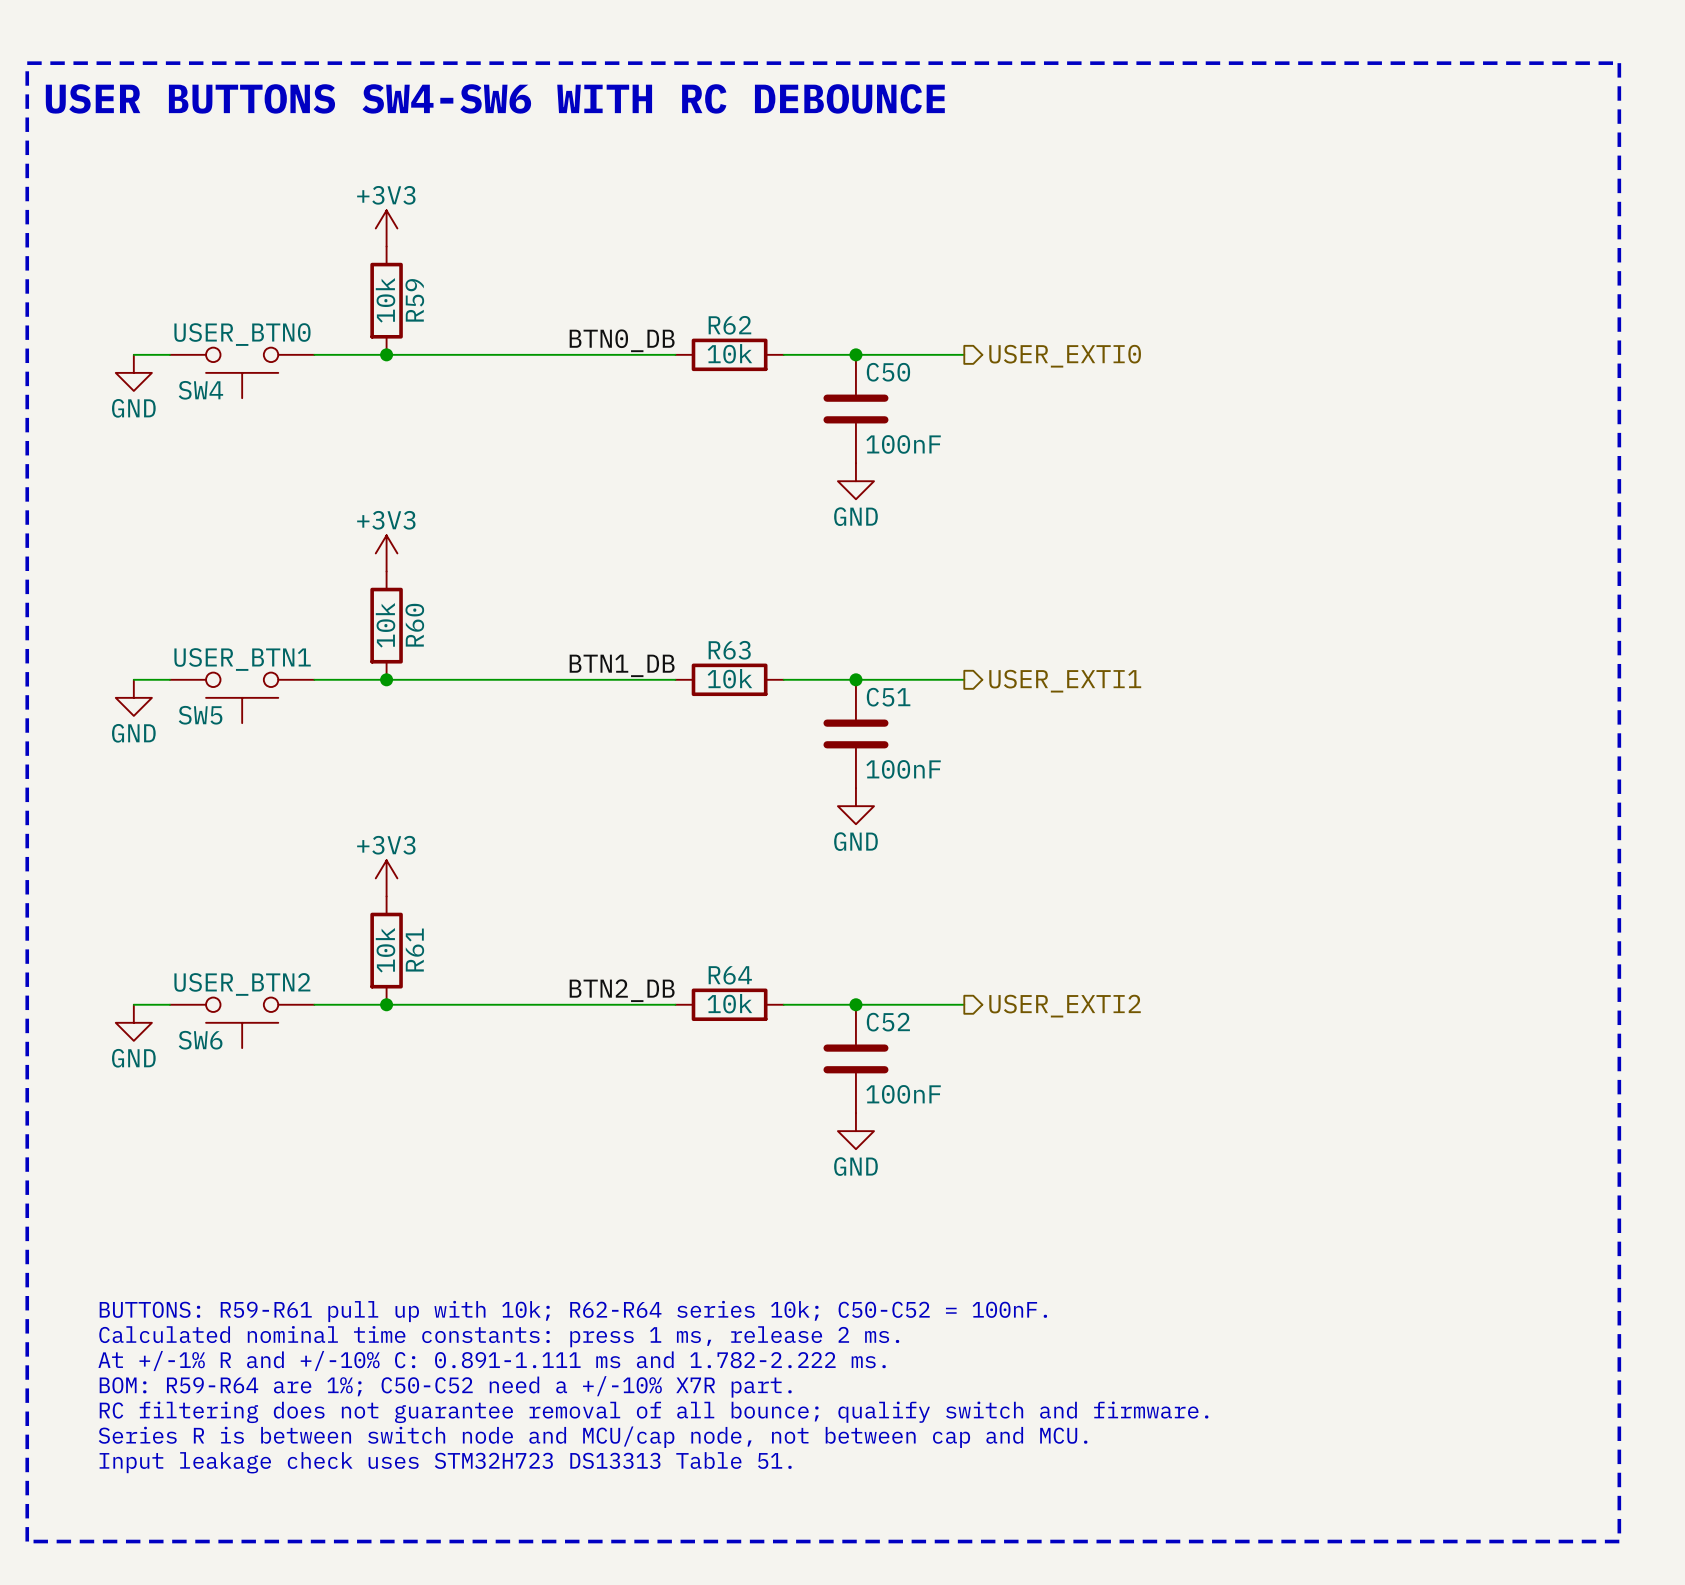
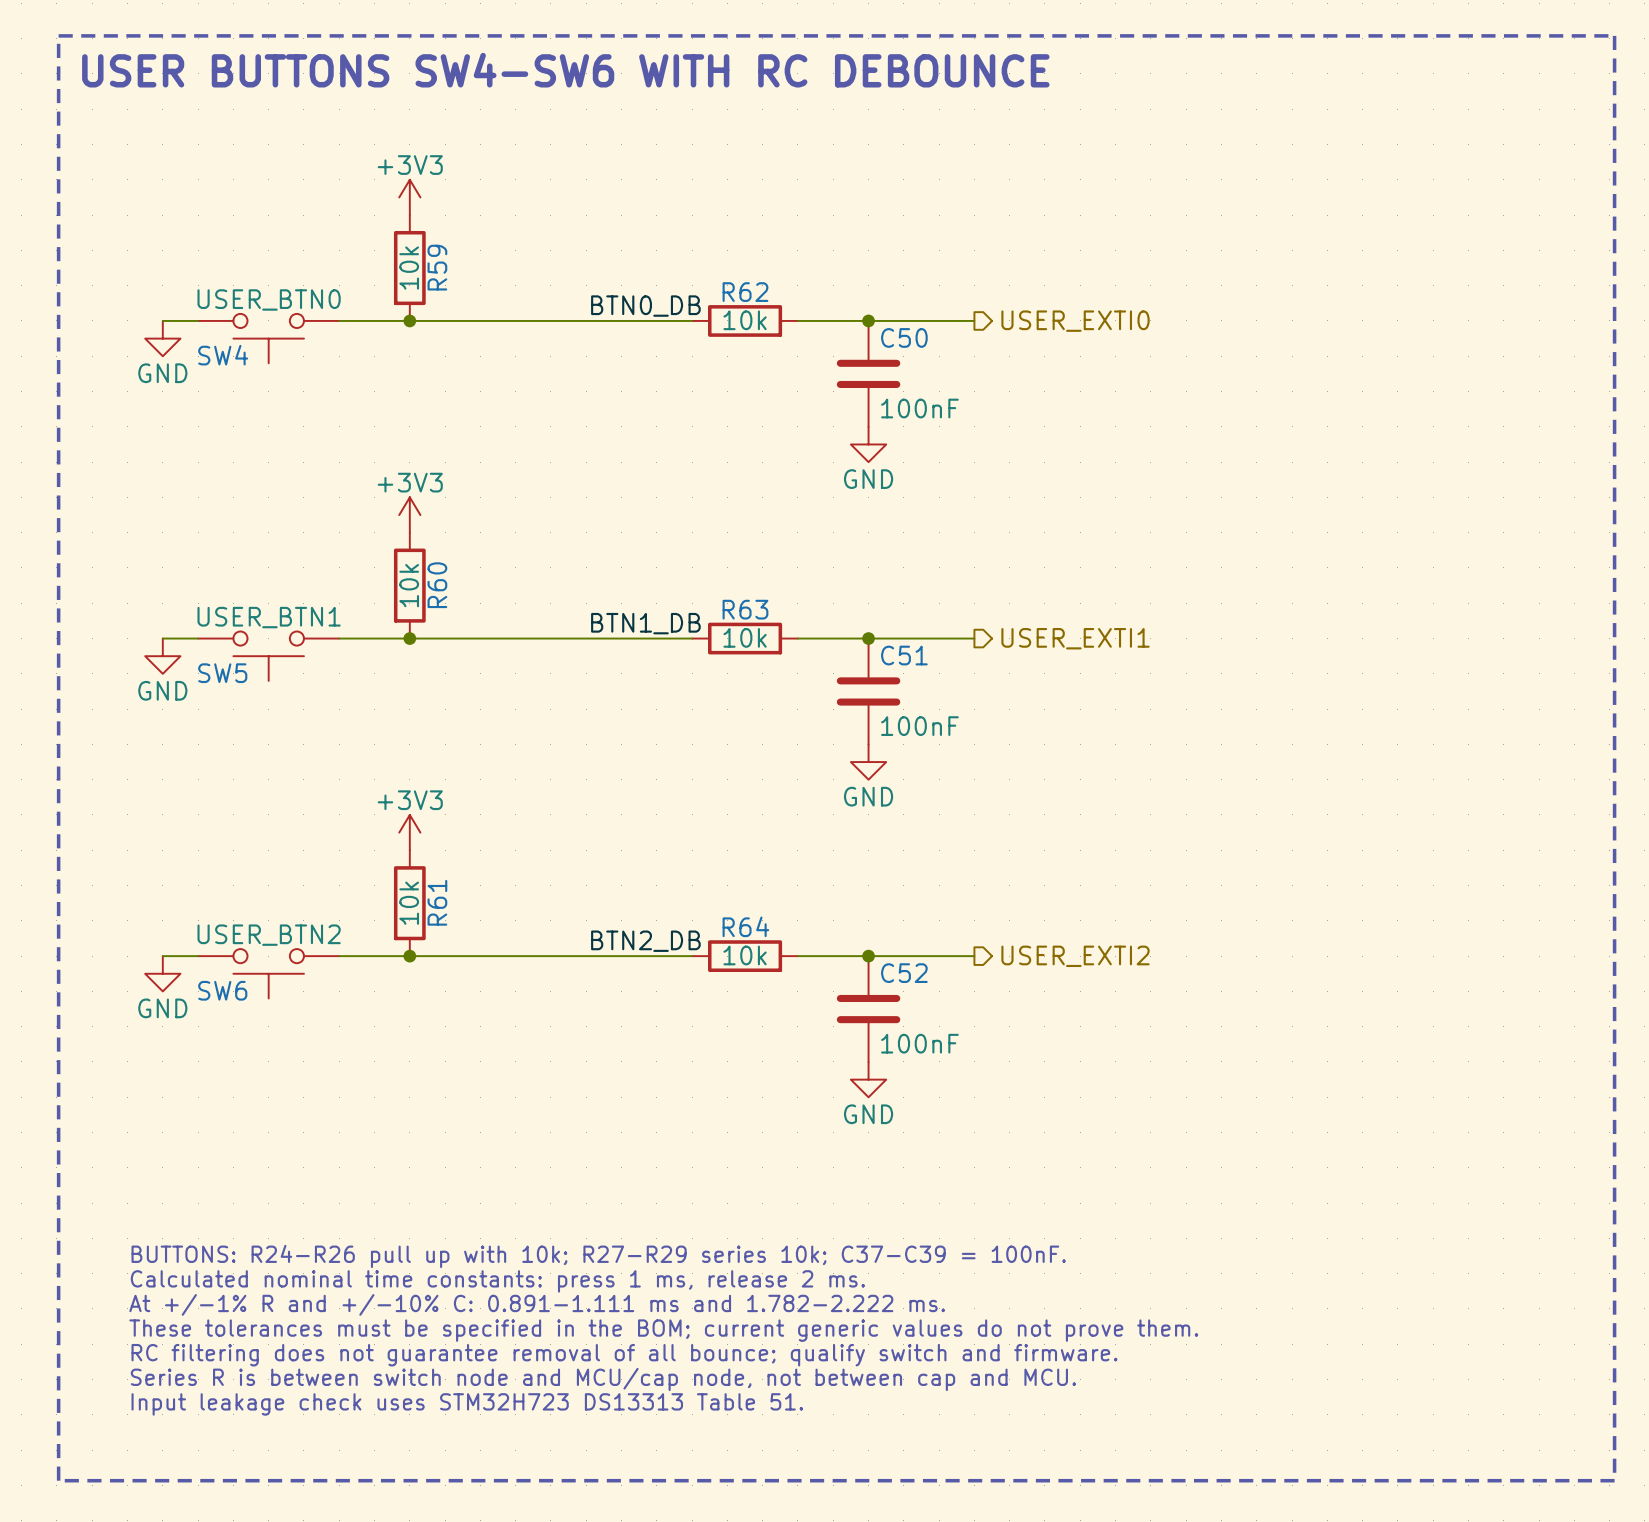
text: BUTTONS: R59-R61 pull up with 10k; R62-R64 series 10k; C50-C52 = 100nF. (573, 1311) -> BUTTONS: R24-R26 pull up with 10k; R27-R29 series 10k; C37-C39 = 100nF. (598, 1256)
text: BOM: R59-R64 are 1%; C50-C52 need a +/-10% X7R part. (445, 1386) -> These tolerances must be specified in the BOM; current generic values do not prove them. (663, 1330)

